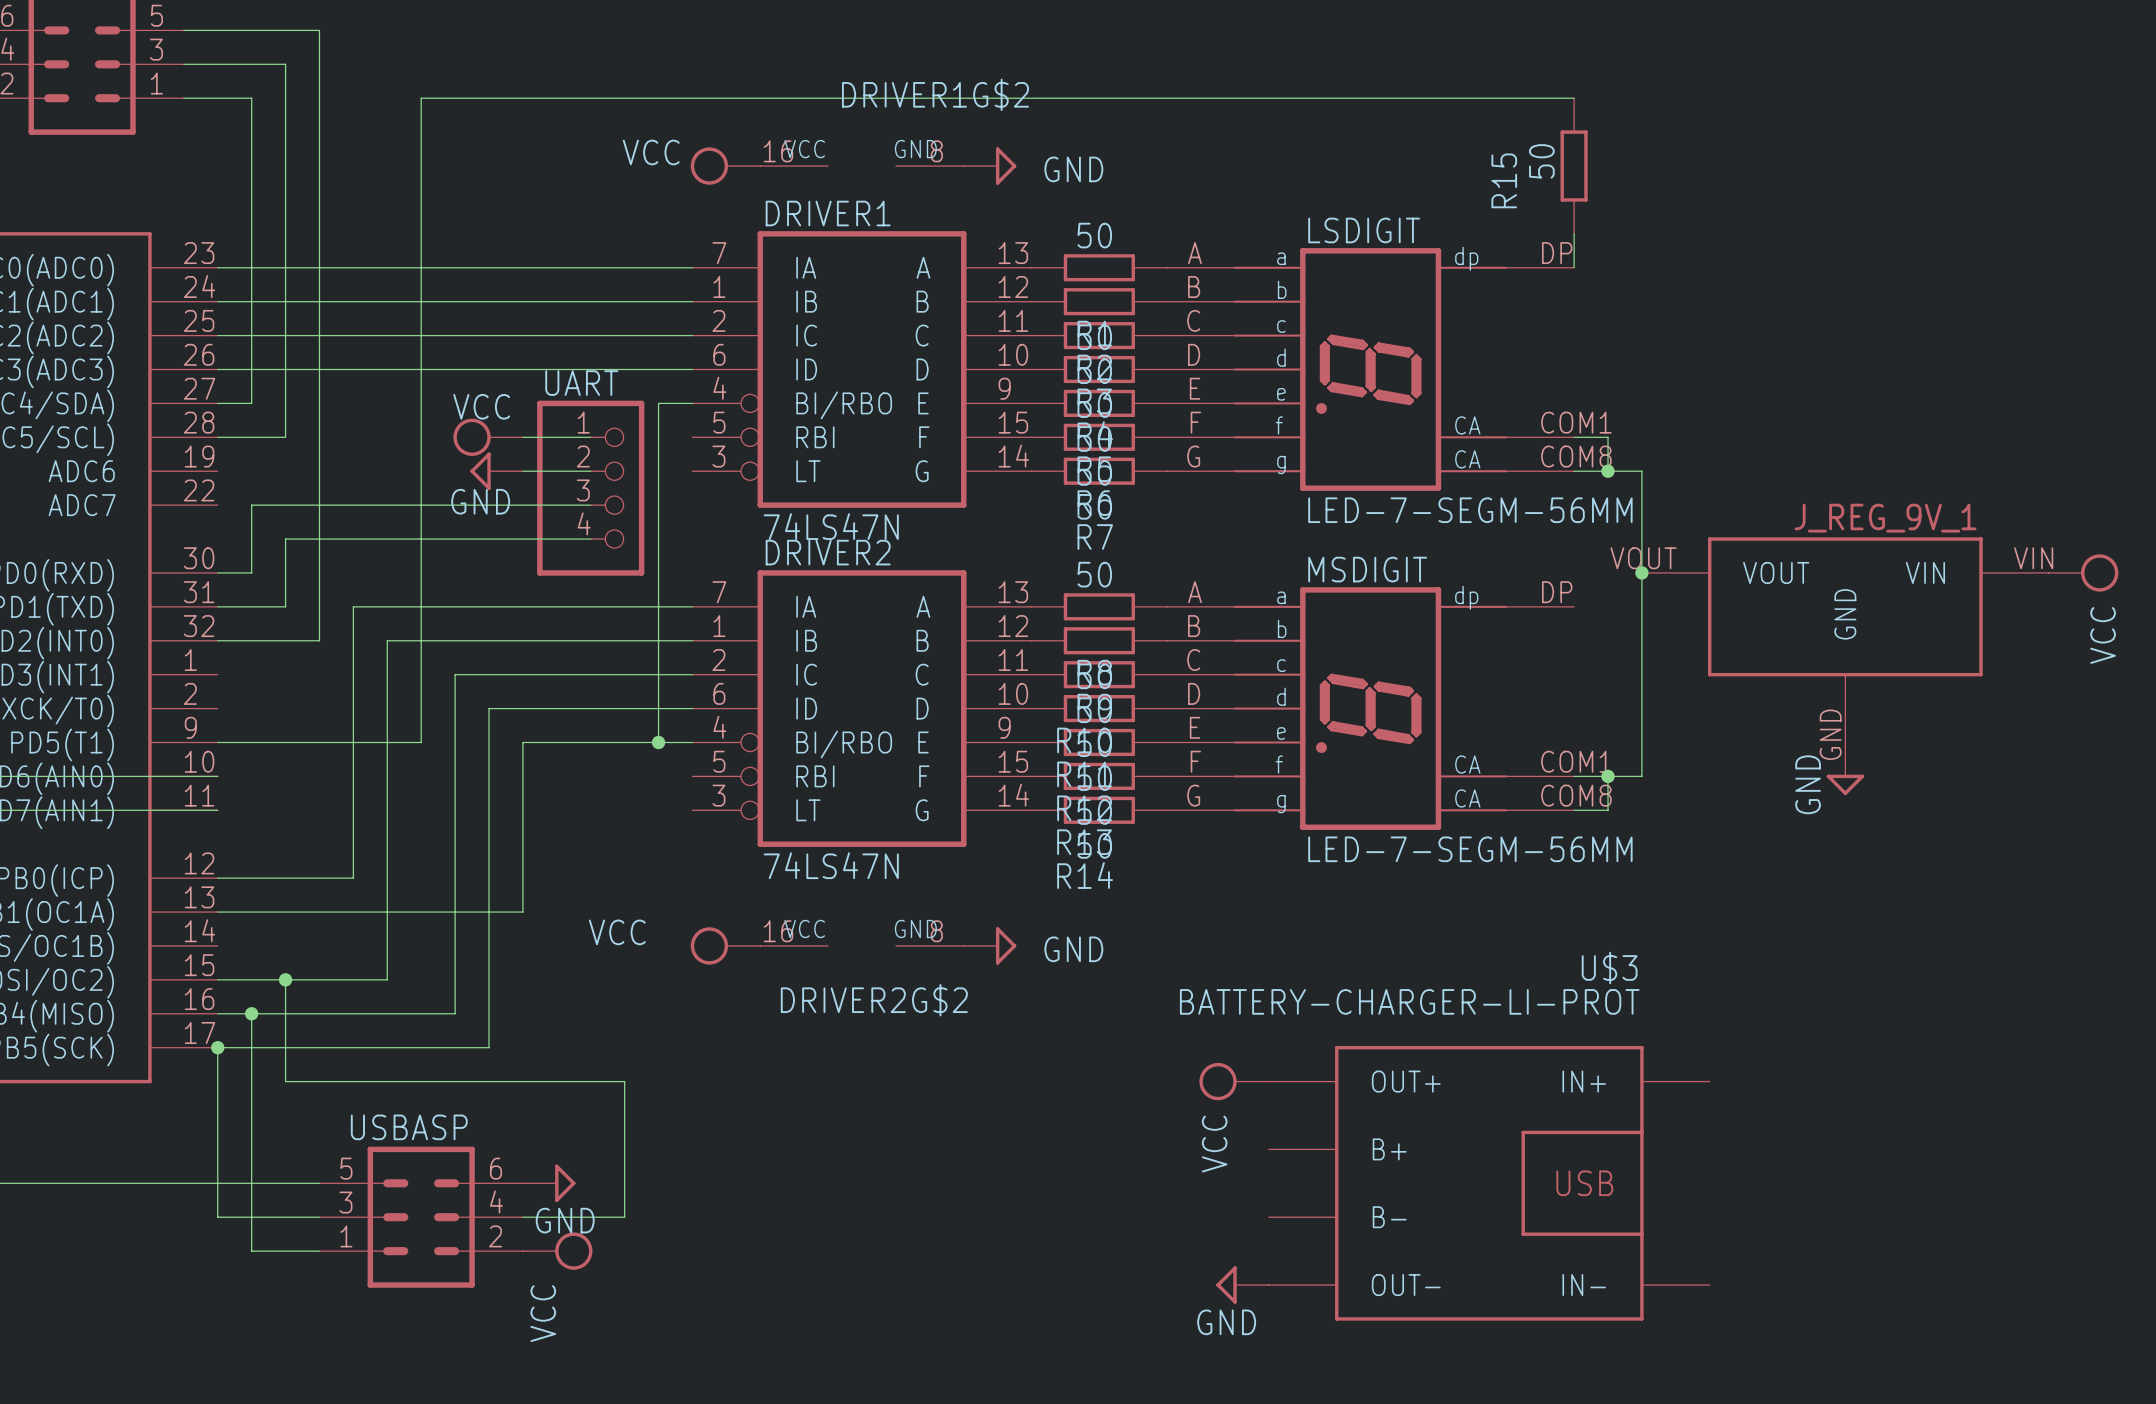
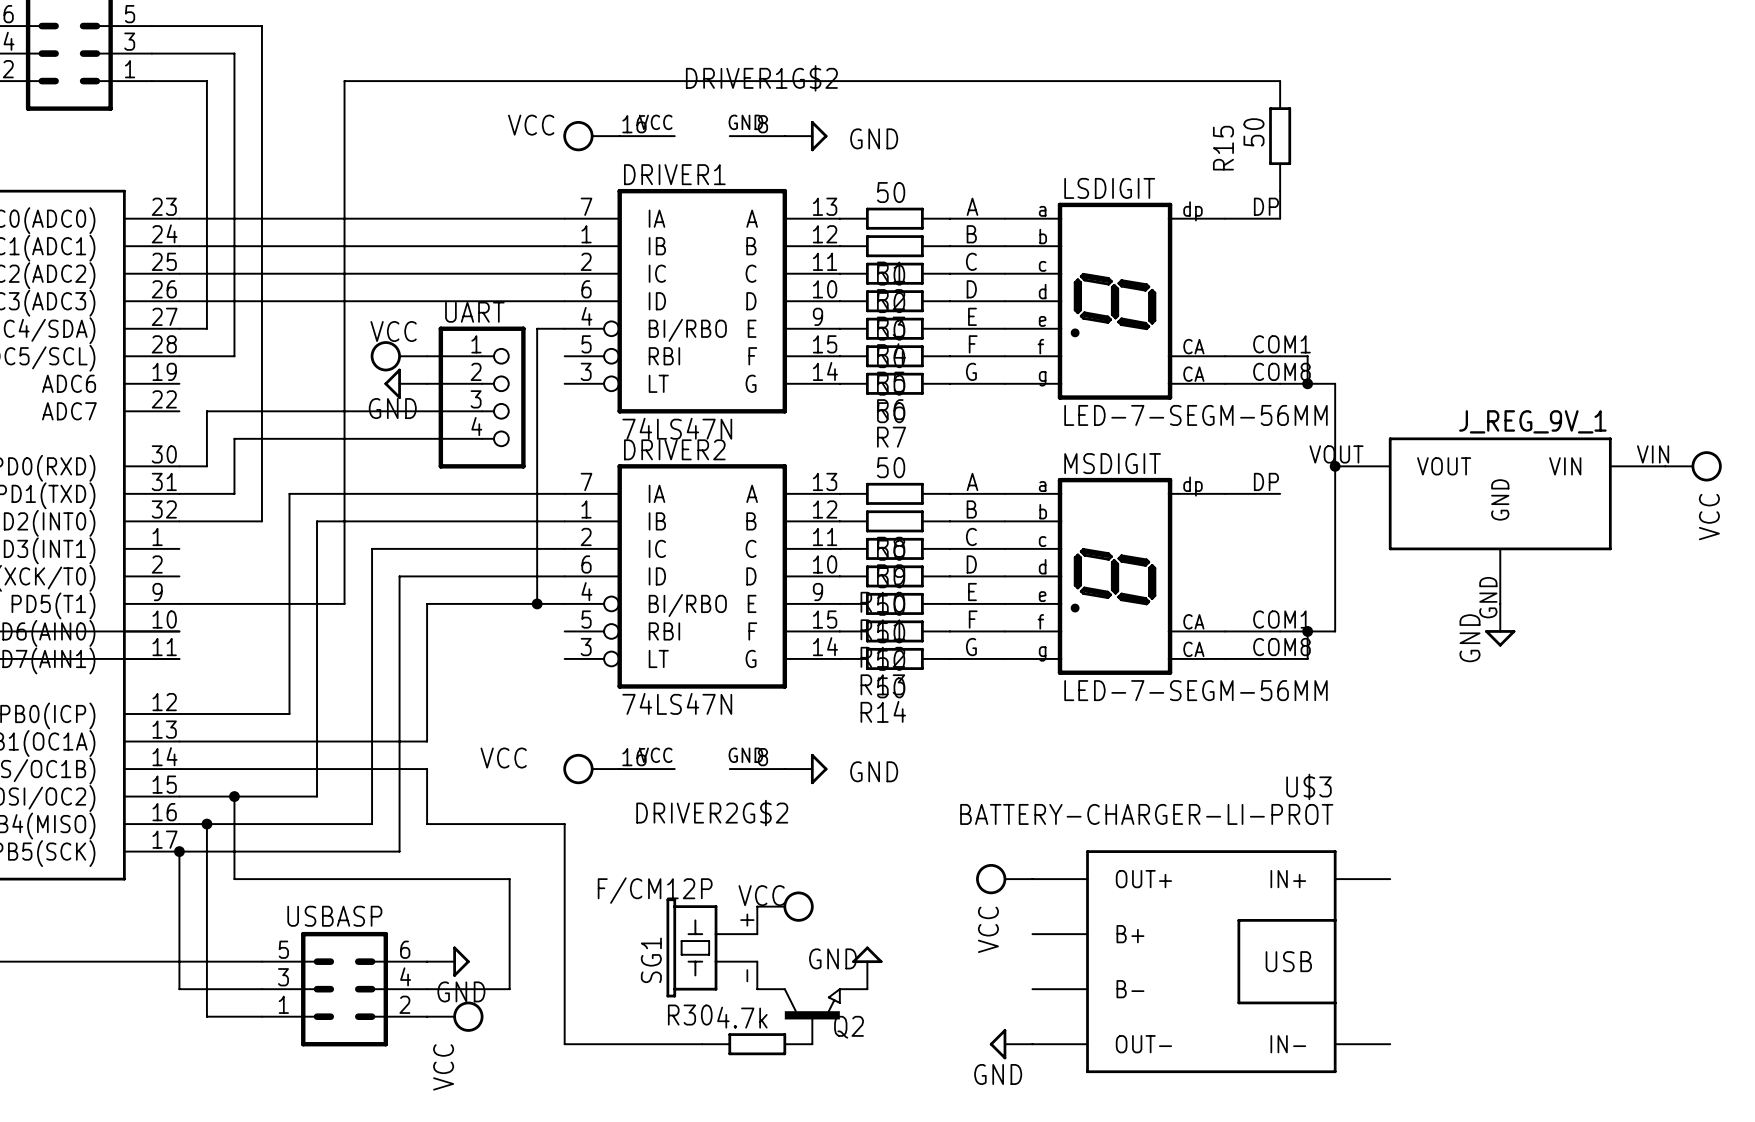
wire: none -> (179, 769) (427, 769) (427, 824) (564, 824) (564, 1044) (702, 1044)
power symbol: none -> VCC (785, 906)
SG1: none -> F/CM12P (712, 947)
power symbol: none -> GND (867, 967)
Q2: none -> (812, 1016)
R30: none -> 4.7k (757, 1044)

